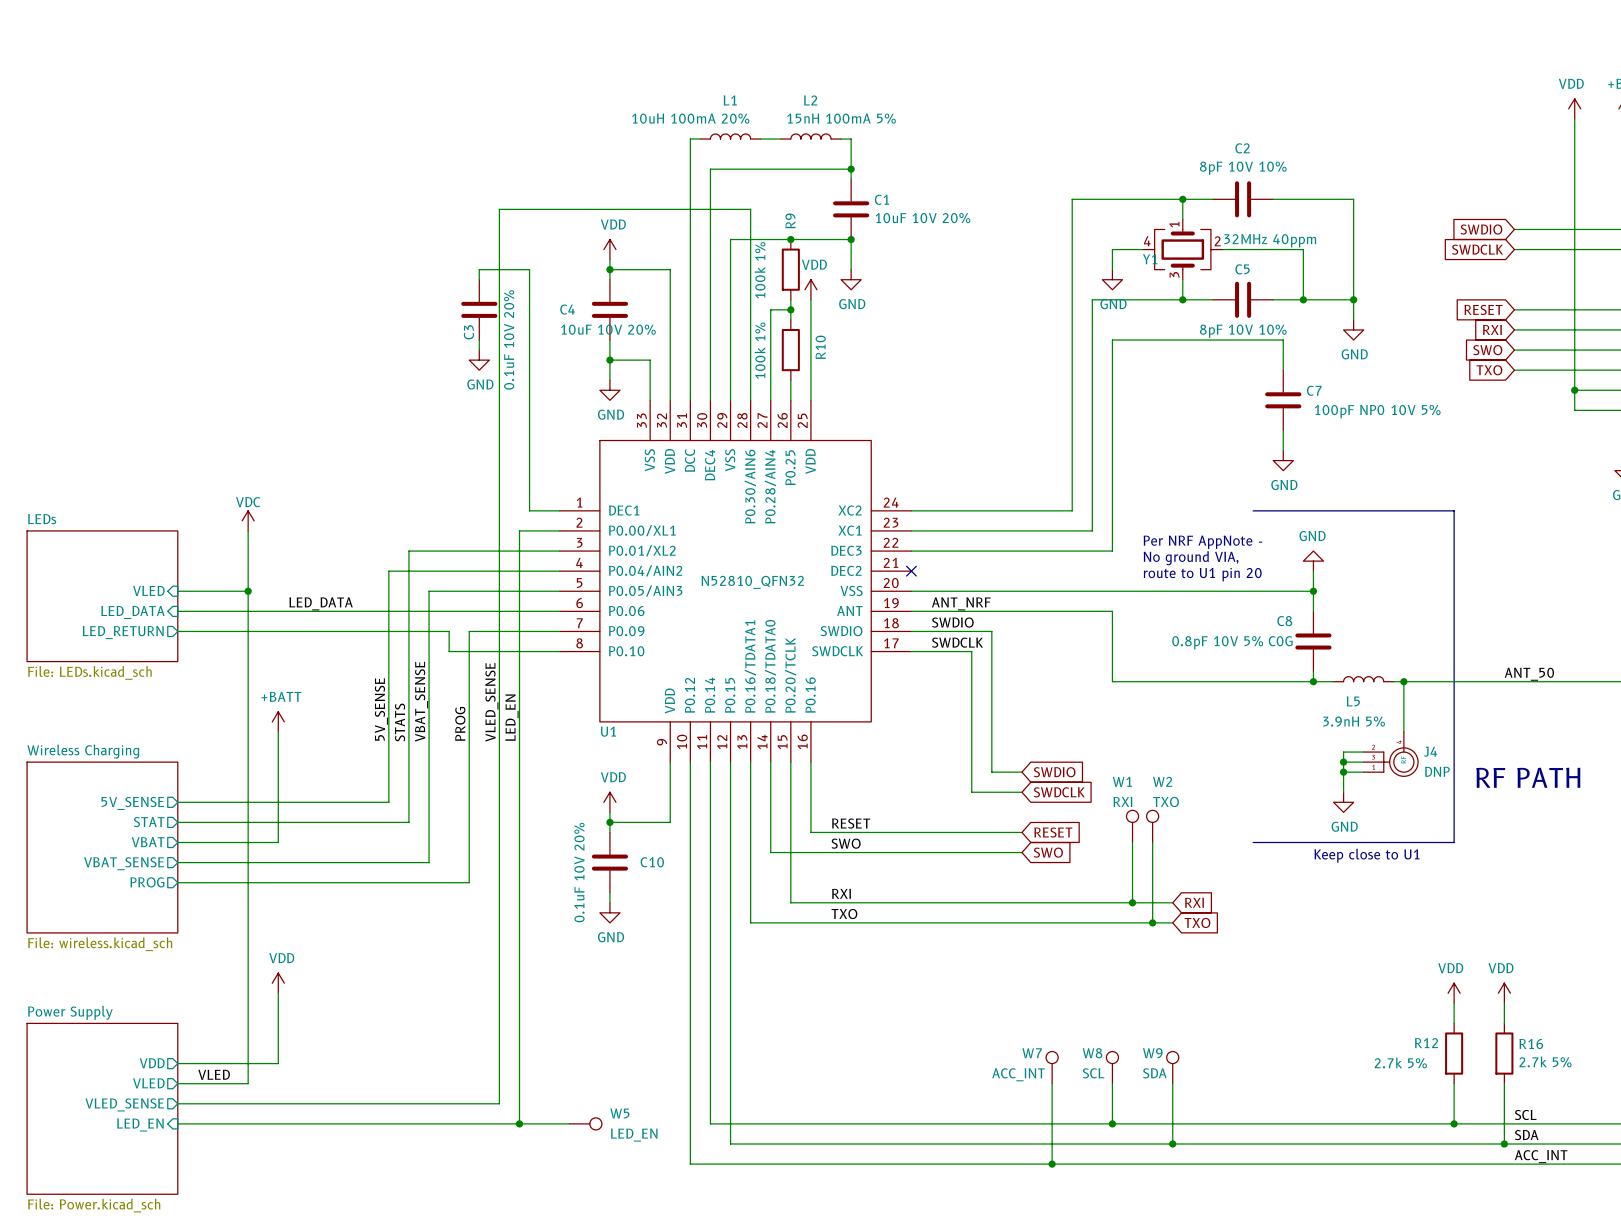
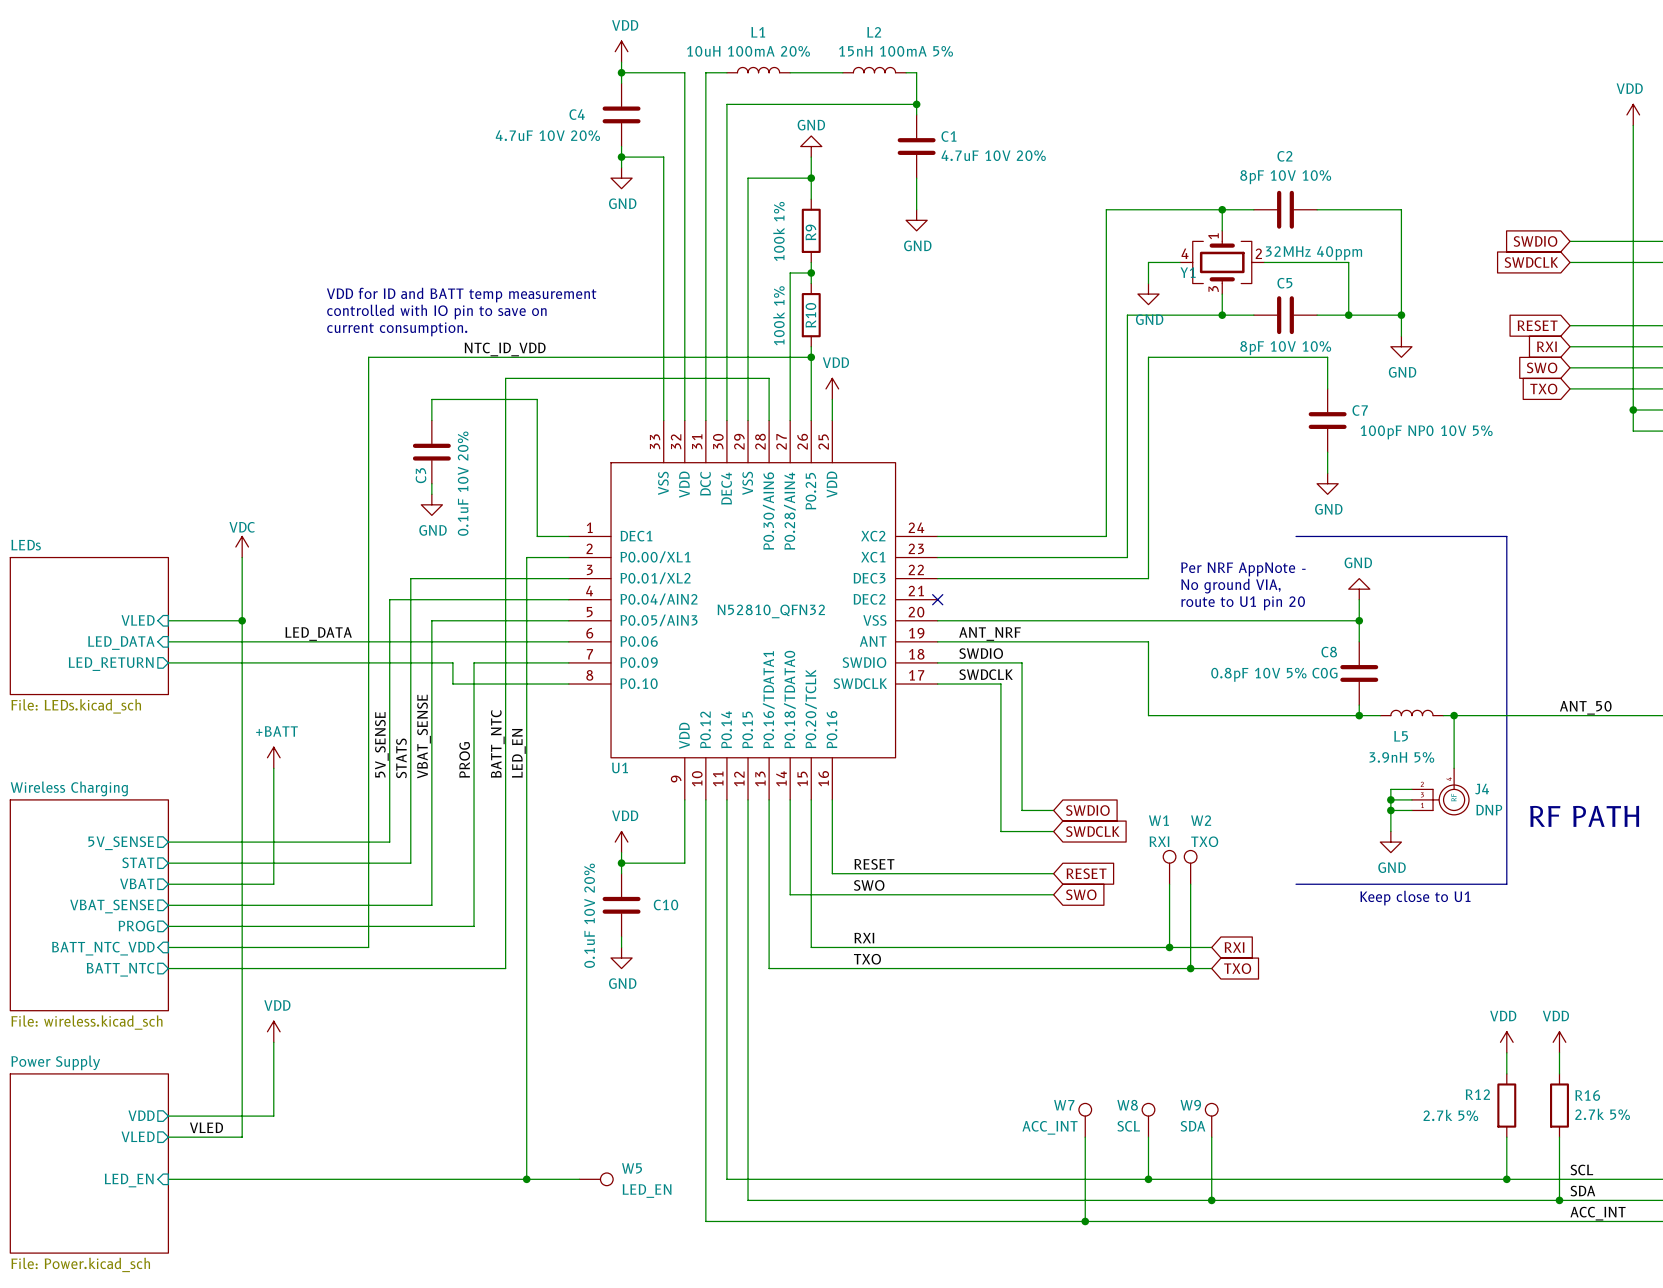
power symbol: none -> VDD (621, 51)
wire: none -> (621, 62) (621, 83)
junction: none -> (621, 72)
wire: none -> (790, 72) (842, 72)
wire: none -> (916, 104) (726, 104) (726, 178)
junction: none -> (916, 104)
L1 value position: 10uH 100mA 20% (690, 118) -> 10uH 100mA 20% (748, 51)
L2 value position: 15nH 100mA 5% (841, 118) -> 15nH 100mA 5% (896, 51)
L1 position: (730, 136) -> (758, 70)
L2 position: (810, 136) -> (874, 70)
wire: (690, 139) (700, 139) -> (705, 146) (705, 72) (726, 72)
wire: (760, 139) (780, 139) -> none
power symbol: none -> GND (811, 146)
wire: (841, 139) (851, 139) (851, 179) -> (906, 72) (916, 72) (916, 114)
wire: none -> (621, 157) (663, 157) (663, 378) (769, 378)
junction: none -> (621, 157)
wire: none -> (811, 157) (811, 199)
power symbol: none -> GND (621, 178)
wire: (710, 169) (730, 169) -> (748, 251) (748, 178)
wire: (790, 169) (851, 169) -> none
junction: none -> (811, 178)
junction: (851, 169) -> none
wire: none -> (916, 178) (916, 209)
C1 position: (851, 209) -> (916, 146)
power symbol: none -> GND (916, 220)
C1 value: 10uF 10V 20% (922, 218) -> 4.7uF 10V 20% (993, 155)
wire: (730, 239) (851, 239) (851, 269) -> none
junction position: (790, 239) -> (811, 273)
junction: (851, 239) -> none
power symbol: VDD (609, 249) -> none
wire: (609, 259) (609, 279) -> (621, 146) (621, 167)
wire: (609, 269) (670, 269) -> (621, 72) (684, 72) (684, 283)
junction: (609, 269) -> none
R9 position: (790, 269) -> (811, 230)
wire: (479, 279) (479, 269) (529, 269) (529, 380) -> (431, 420) (431, 399) (537, 399)
power symbol: GND (851, 279) -> none
text: none -> VDD for ID and BATT temp measurement (461, 295)
power symbol position: VDD (810, 289) -> VDD (832, 388)
text: none -> controlled with IO pin to save on (436, 312)
wire: (790, 299) (790, 319) -> (811, 262) (811, 283)
wire: (810, 299) (810, 380) -> none
C3 position: (479, 309) -> (431, 452)
C4 position: (609, 309) -> (621, 114)
wire: (770, 309) (790, 309) -> (790, 325) (790, 273) (811, 273)
junction: (790, 309) -> none
text: none -> current consumption. (397, 329)
C4 value: 10uF 10V 20% (608, 329) -> 4.7uF 10V 20% (547, 135)
wire: none -> (811, 346) (811, 399)
label: none -> NTC_ID_VDD (505, 349)
wire: (479, 340) (479, 350) -> (431, 483) (431, 494)
wire: (609, 340) (609, 380) -> none
wire: none -> (811, 357) (368, 357) (368, 947) (168, 947)
junction: none -> (811, 357)
R10 name position: R10 (820, 347) -> R10 (810, 315)
R10 position: (790, 350) -> (811, 315)
power symbol: GND (479, 360) -> none
wire: (499, 360) (499, 209) (750, 209) (750, 360) -> (505, 378) (621, 378)
junction: (609, 360) -> none
power symbol: GND (609, 390) -> none
power symbol: none -> GND (431, 504)
label: VLED_SENSE (491, 702) -> BATT_NTC (497, 743)
sheet Wireless Charging: File: wireless.kicad_sch (102, 847) -> none
sheet Wireless Charging: none -> File: wireless.kicad_sch (89, 905)
sheet pin: none -> BATT_NTC_VDD (103, 948)
wire: (499, 922) (499, 1103) (177, 1103) -> (505, 968) (168, 968)
sheet pin: none -> BATT_NTC (120, 969)
sheet pin: VLED_SENSE (124, 1104) -> none

